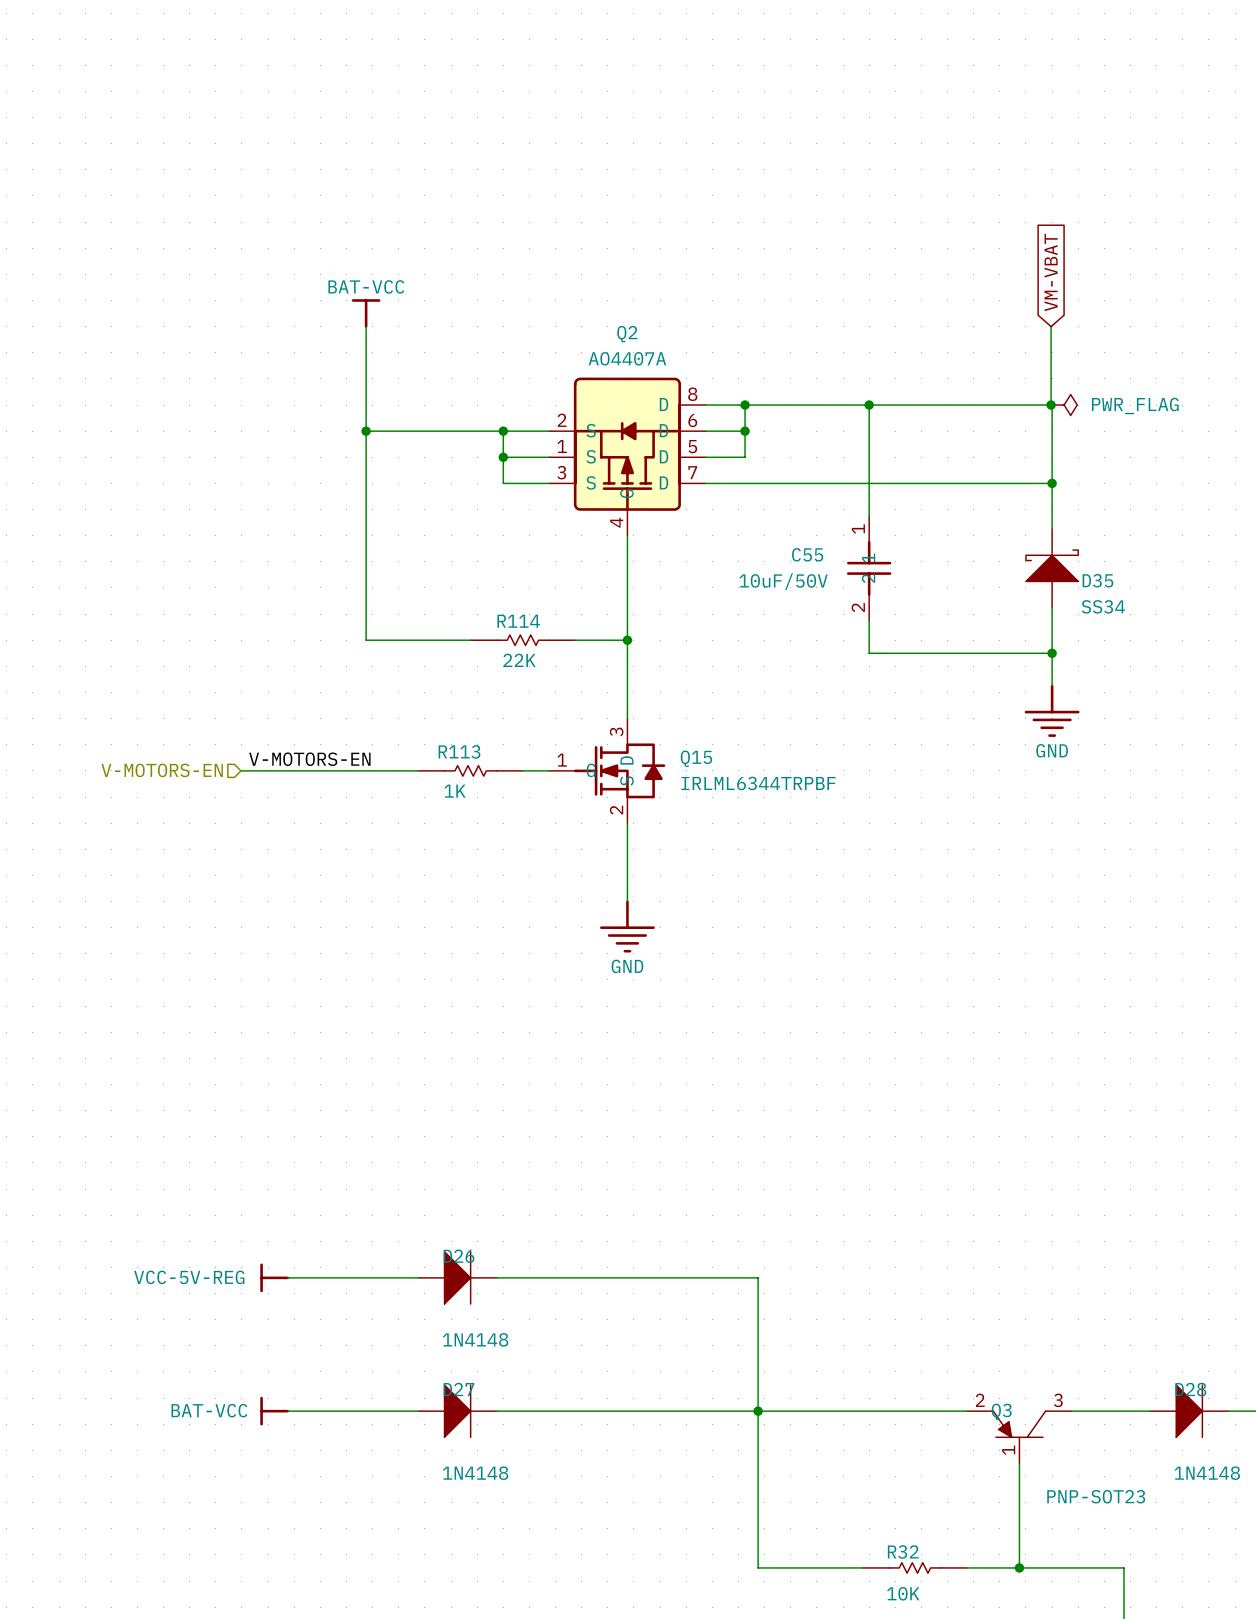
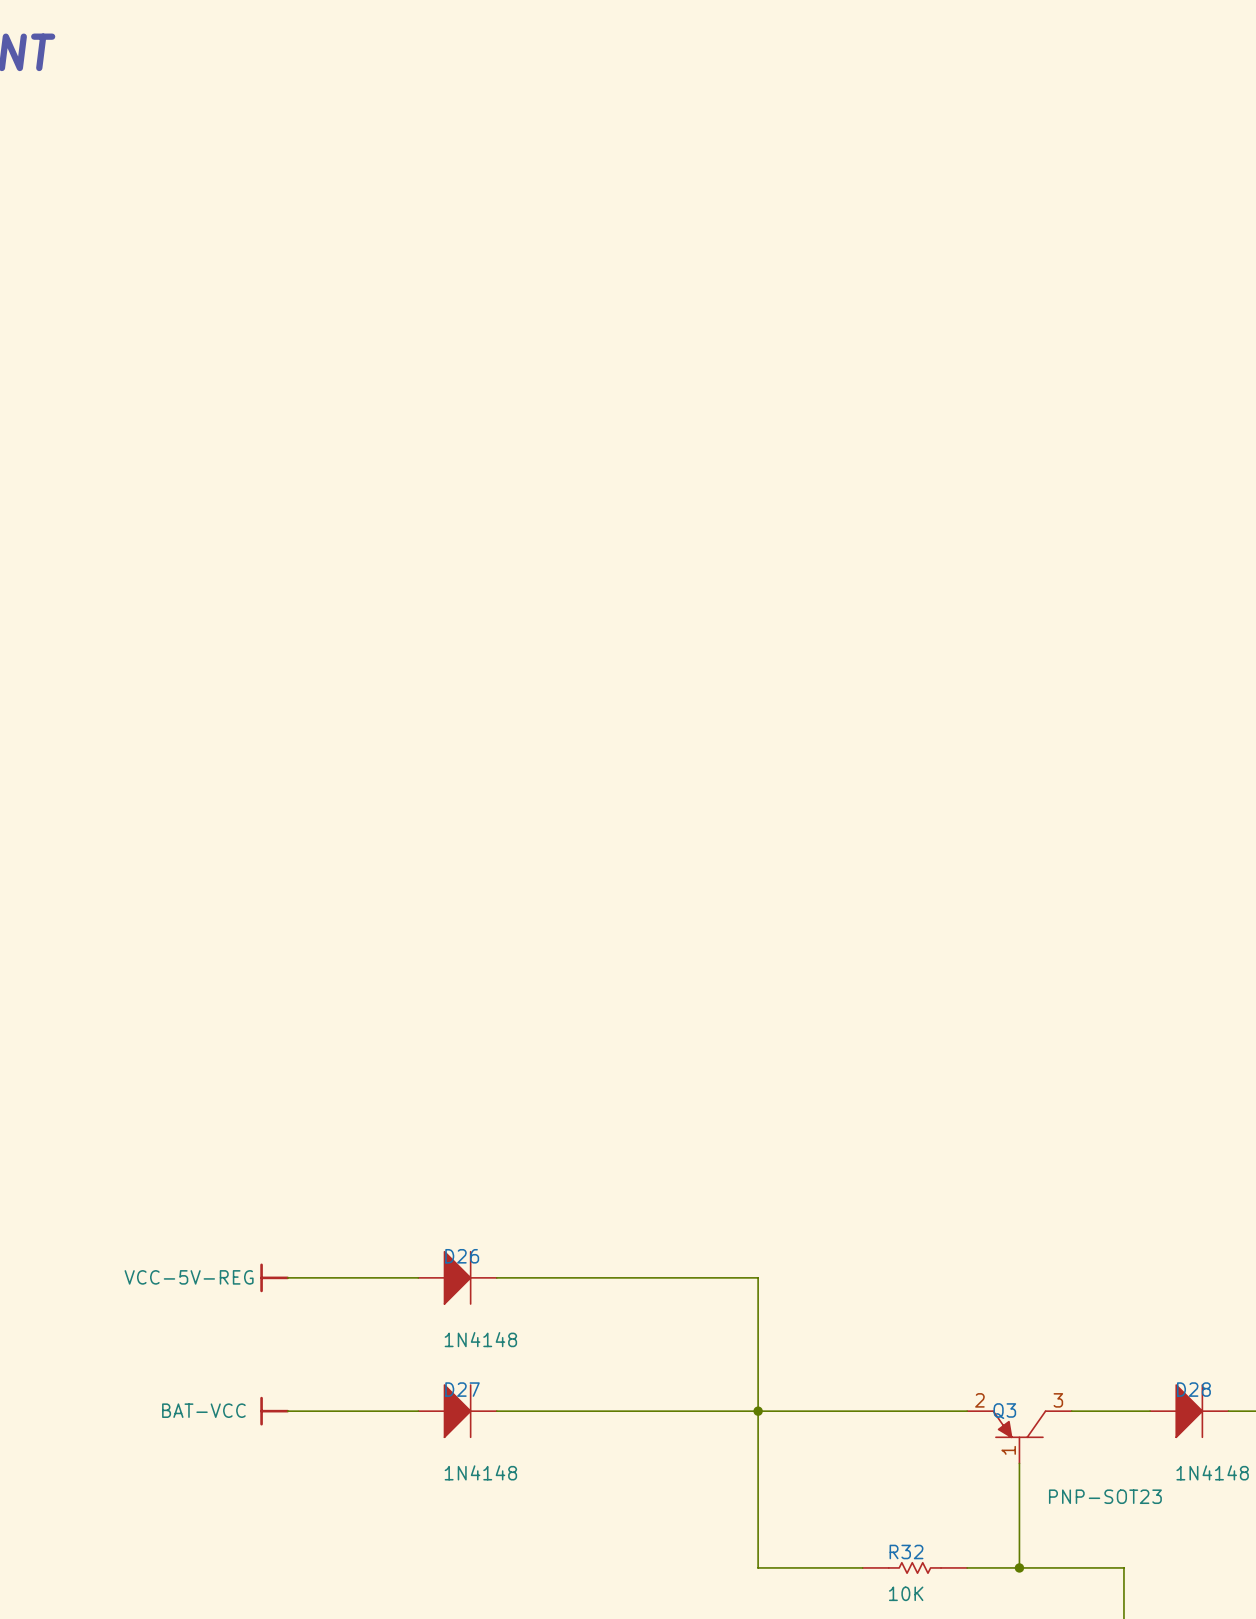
global label: VM-VBAT (1051, 272) -> none
power symbol: BAT-VCC (366, 313) -> none
wire: (366, 326) (366, 640) (470, 640) -> none
wire: (1051, 326) (1051, 405) -> none
wire: (705, 405) (1052, 405) (1052, 529) -> none
wire: (745, 405) (745, 457) (705, 457) -> none
junction: (745, 405) -> none
wire: (869, 405) (869, 516) -> none
junction: (869, 405) -> none
junction: (1051, 405) -> none
power symbol: PWR_FLAG (1064, 405) -> none
wire: (366, 431) (549, 431) -> none
junction: (366, 431) -> none
wire: (503, 431) (503, 483) (549, 483) -> none
junction: (503, 431) -> none
wire: (705, 431) (745, 431) -> none
junction: (745, 431) -> none
Q2: AO4407A (627, 456) -> none
wire: (503, 457) (549, 457) -> none
junction: (503, 457) -> none
wire: (705, 483) (1052, 483) -> none
junction: (1052, 483) -> none
wire: (627, 535) (627, 718) -> none
C55: 10uF/50V (869, 568) -> none
D35: SS34 (1052, 568) -> none
wire: (1052, 607) (1052, 685) -> none
wire: (869, 620) (869, 653) (1052, 653) -> none
R114: 22K (522, 640) -> none
wire: (575, 640) (627, 640) -> none
junction: (627, 640) -> none
junction: (1052, 653) -> none
power symbol: GND (1052, 710) -> none
label: V-MOTORS-EN (309, 759) -> none
hierarchical label: V-MOTORS-EN (162, 770) -> none
wire: (240, 770) (418, 770) -> none
R113: 1K (470, 770) -> none
wire: (522, 770) (549, 770) -> none
Q15: IRLML6344TRPBF (607, 770) -> none
wire: (627, 823) (627, 901) -> none
power symbol: GND (627, 926) -> none

